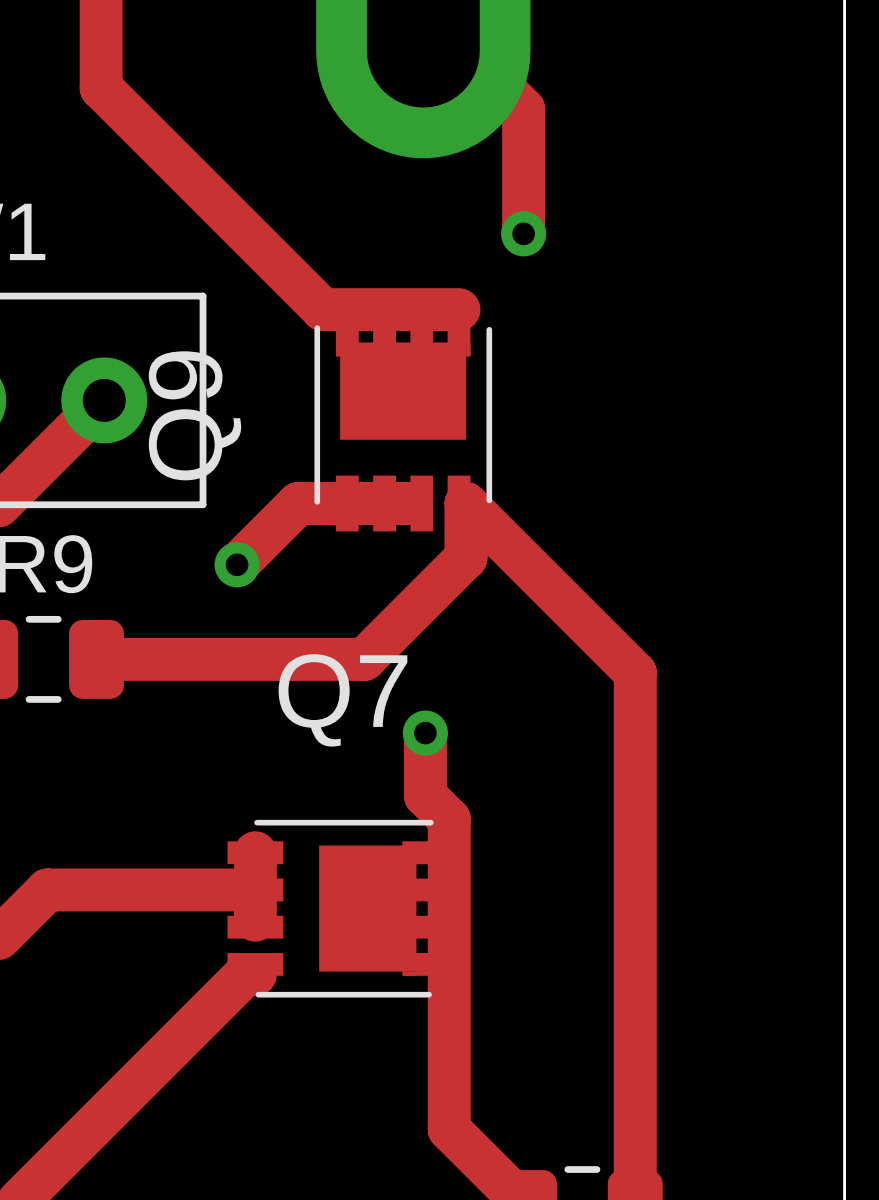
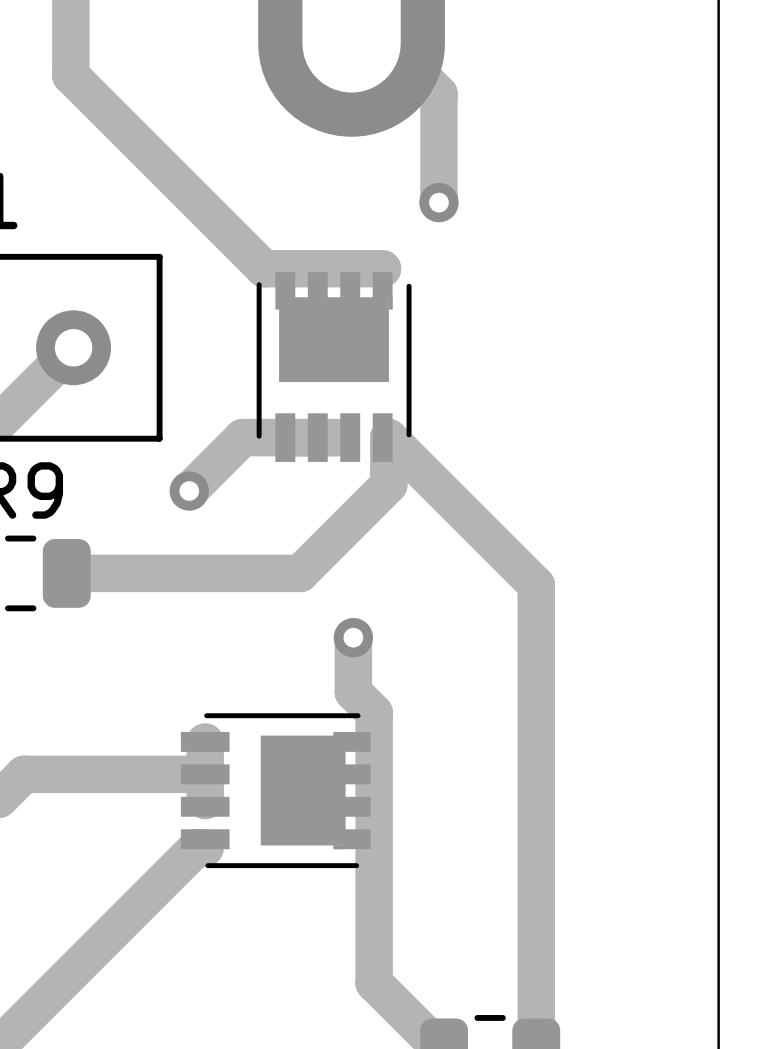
Q9 name: Q9 (194, 415) -> none
Q7 name: Q7 (342, 700) -> none

